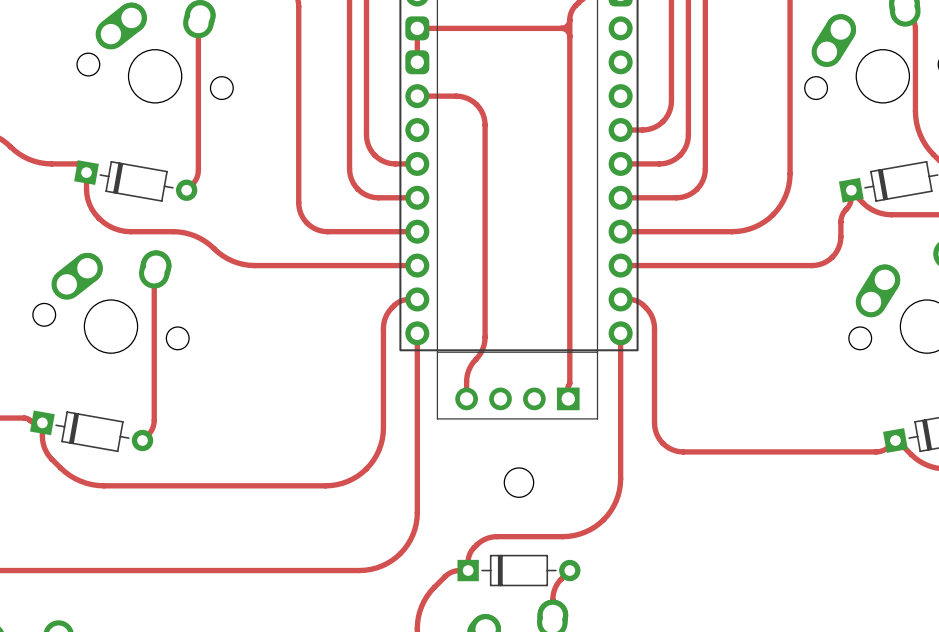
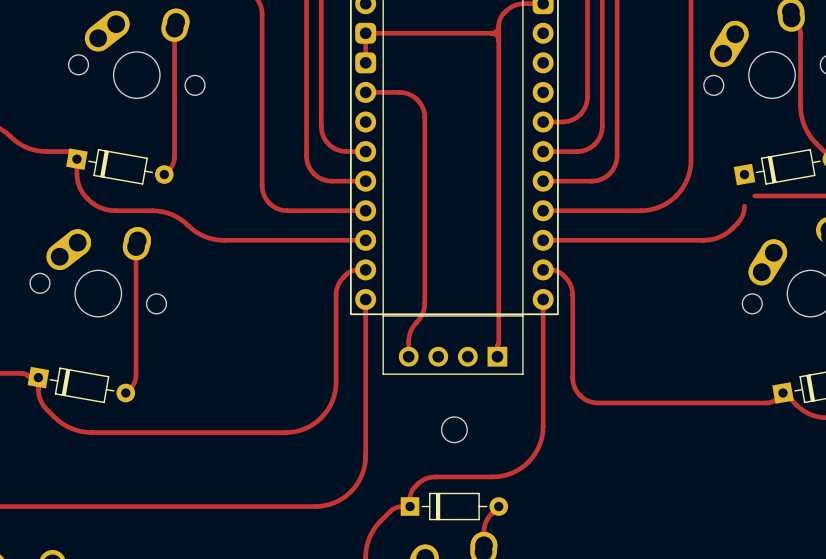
track: (851, 191) (871, 209) (891, 214) -> (754, 195) (779, 195)
track: (851, 197) (850, 203) (841, 216) (840, 240) (834, 254) (823, 263) (804, 265) -> (744, 206) (741, 218) (728, 231) (719, 237) (703, 240)

